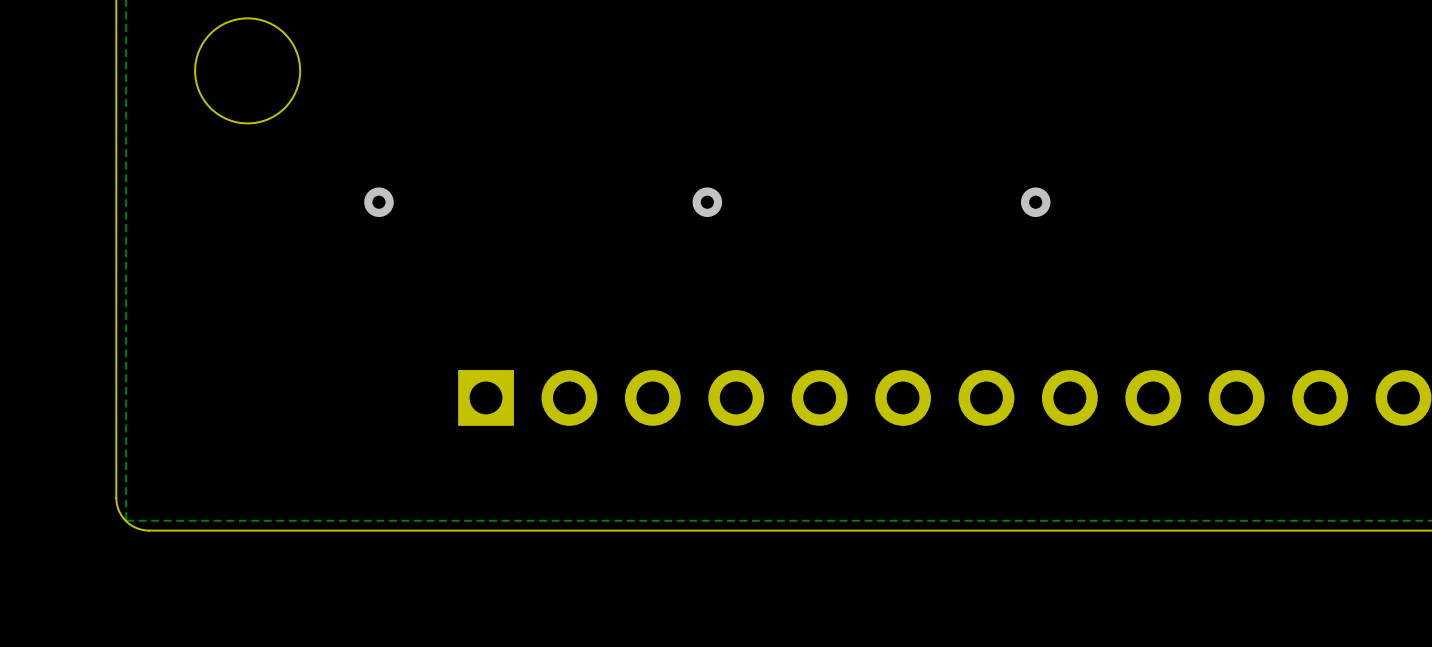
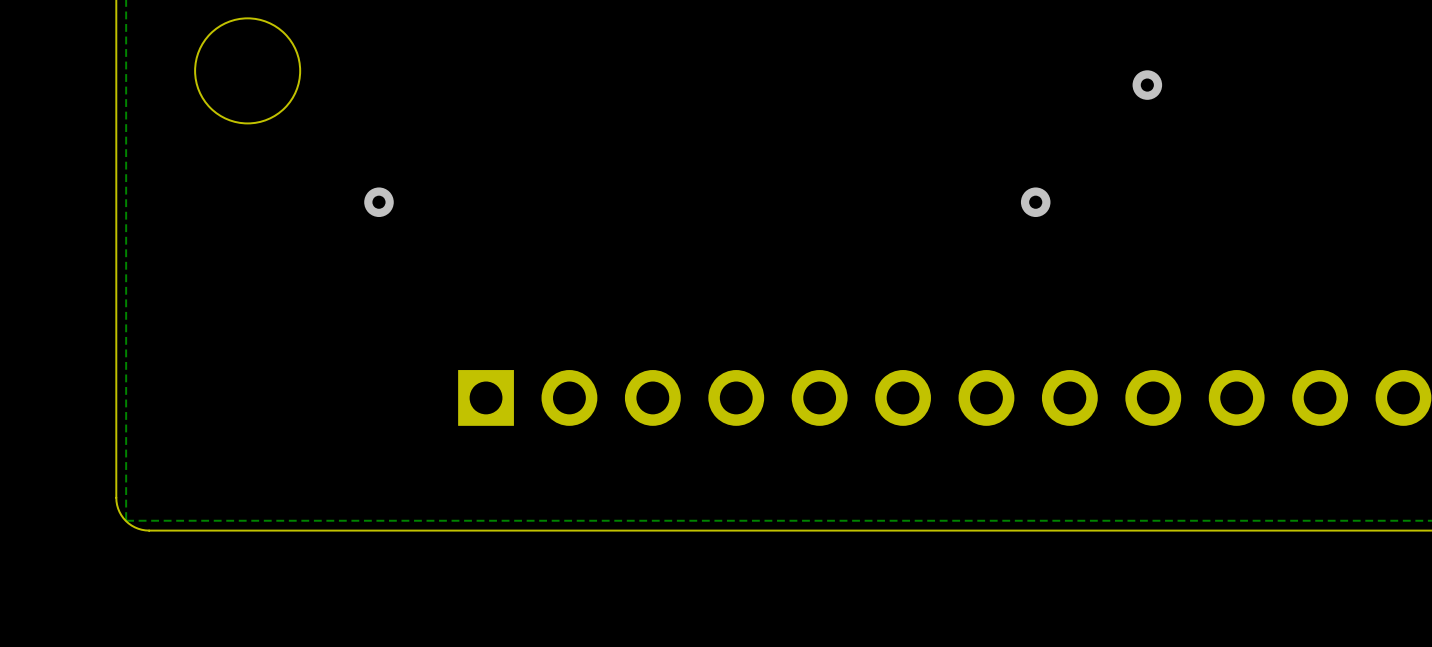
via: none -> (1147, 85)
via: (707, 202) -> none

